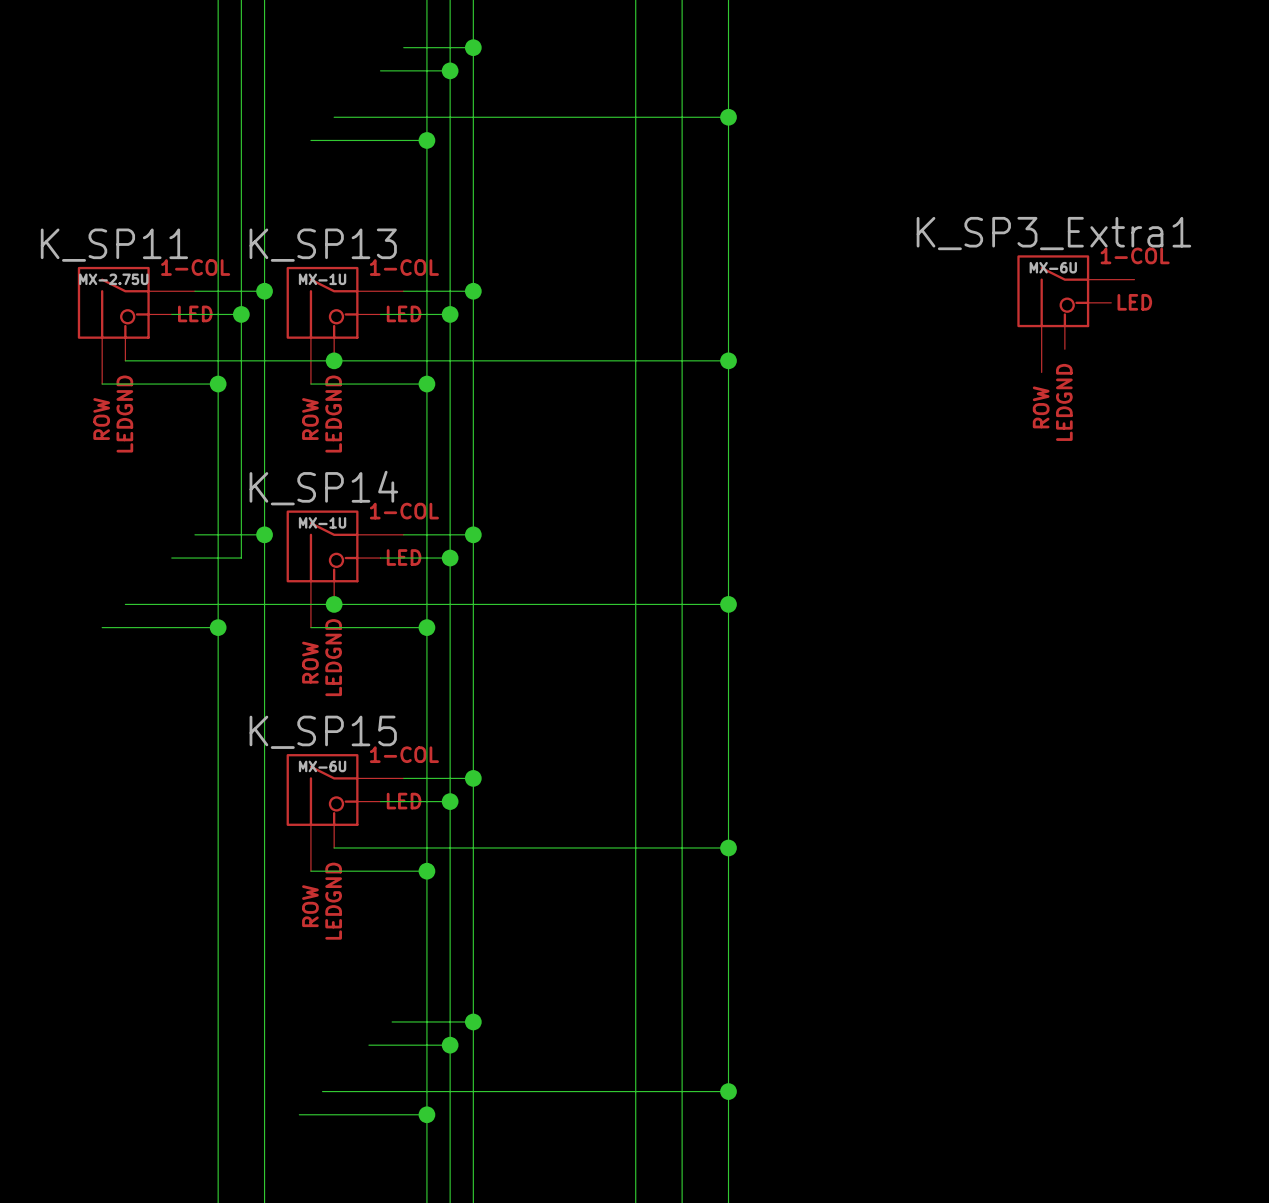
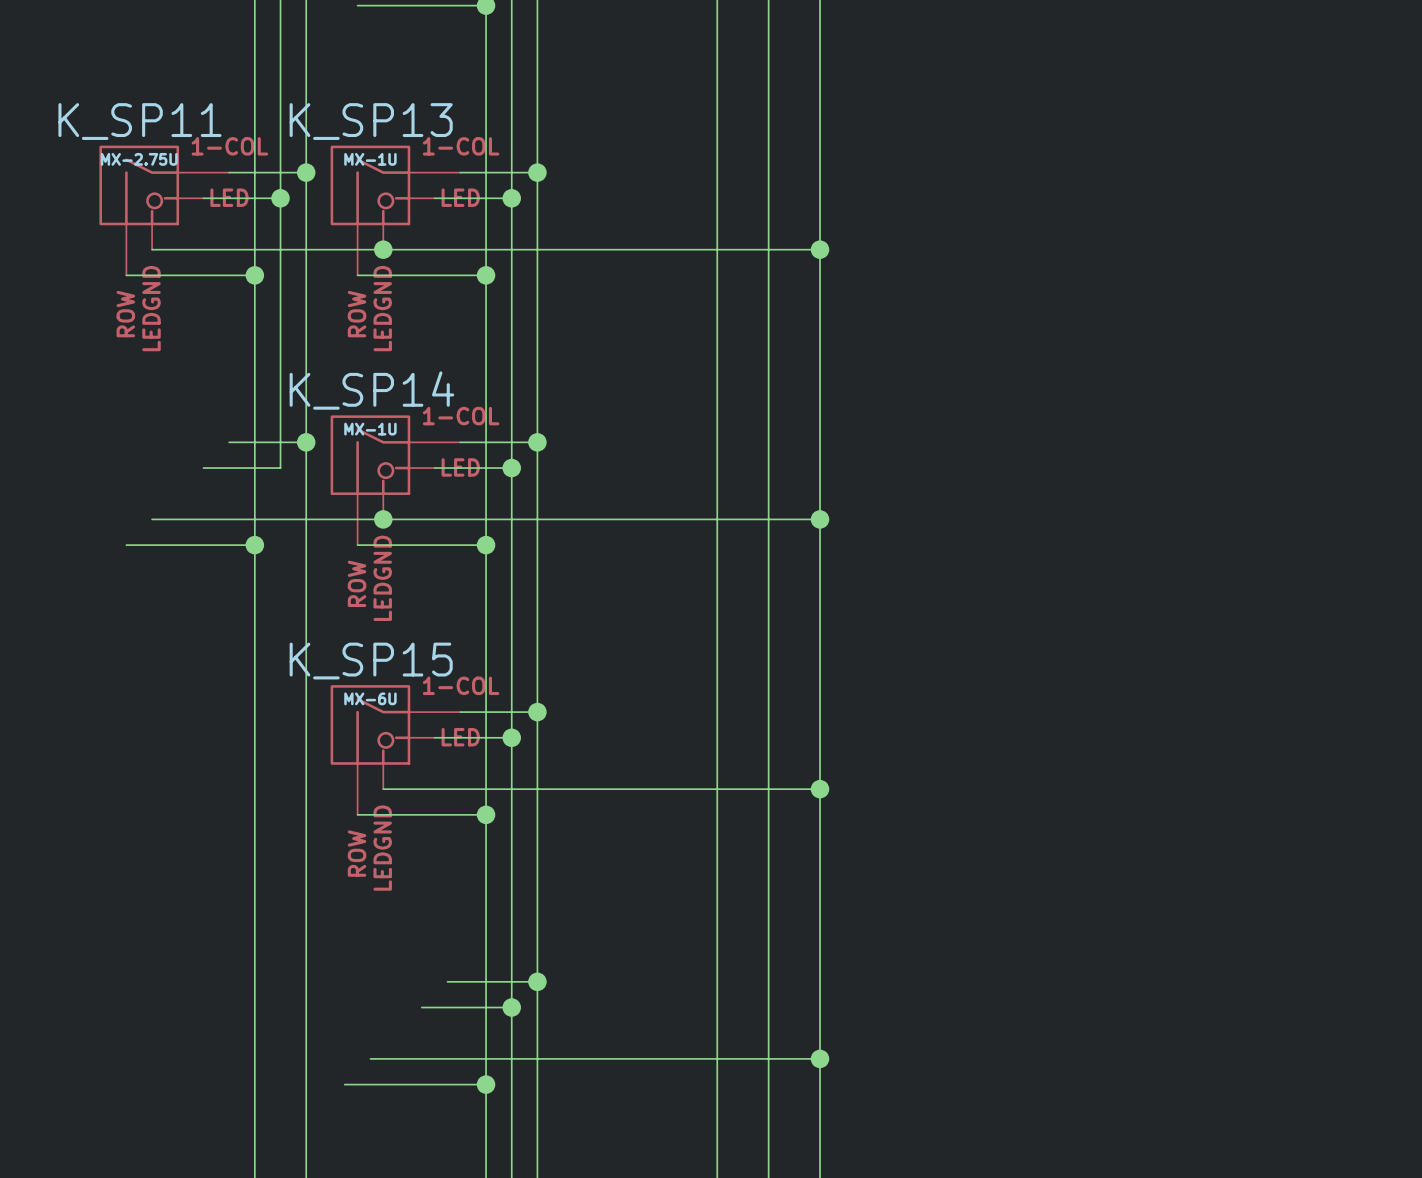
K_SP3_Extra1: MX-6U (1075, 313) -> none

